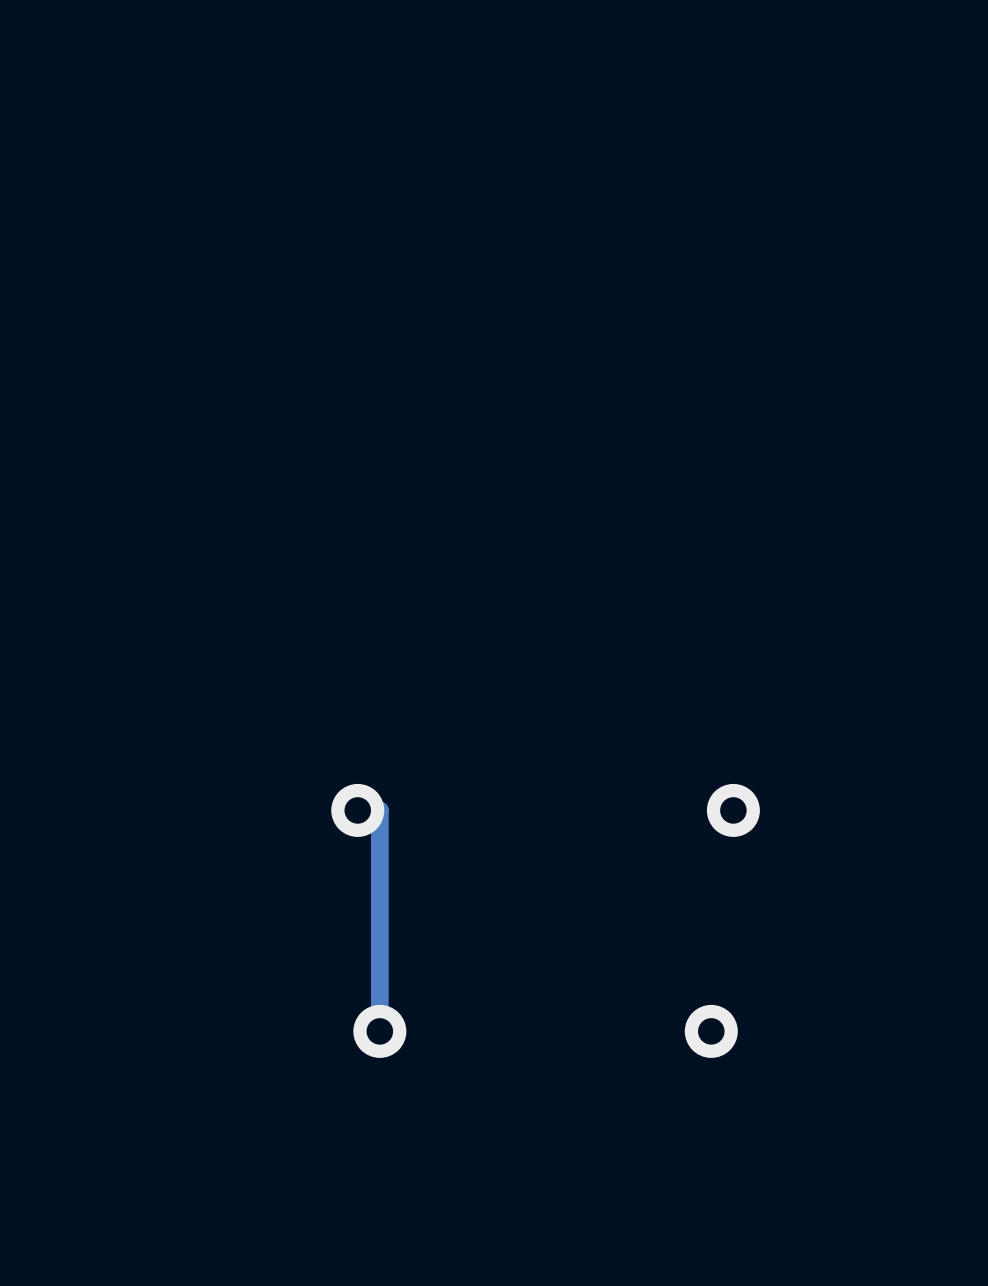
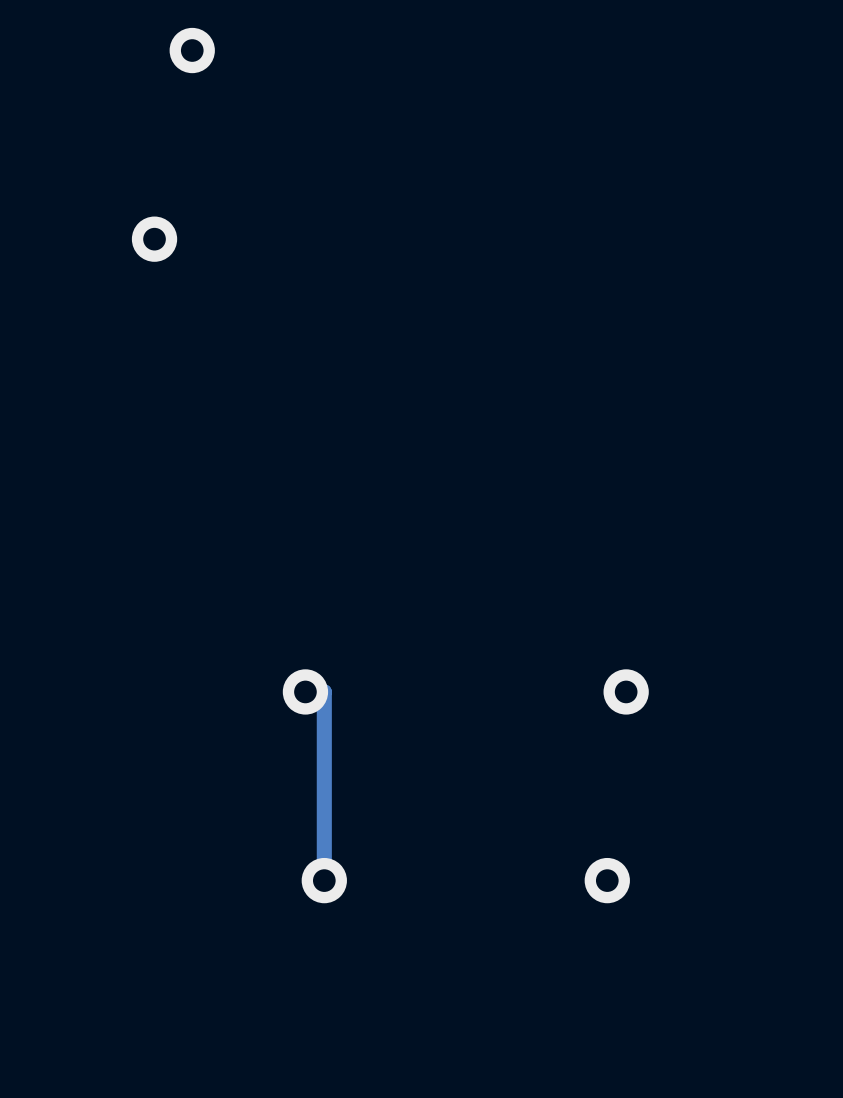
via: none -> (192, 50)
via: none -> (154, 239)

